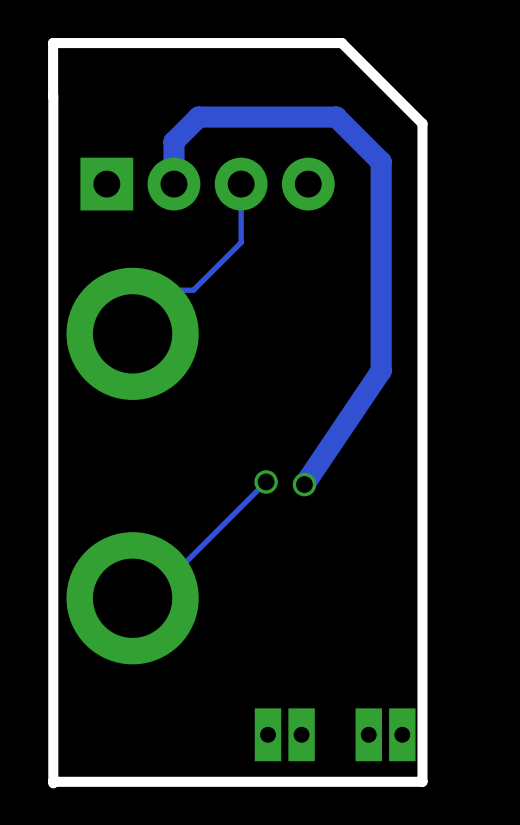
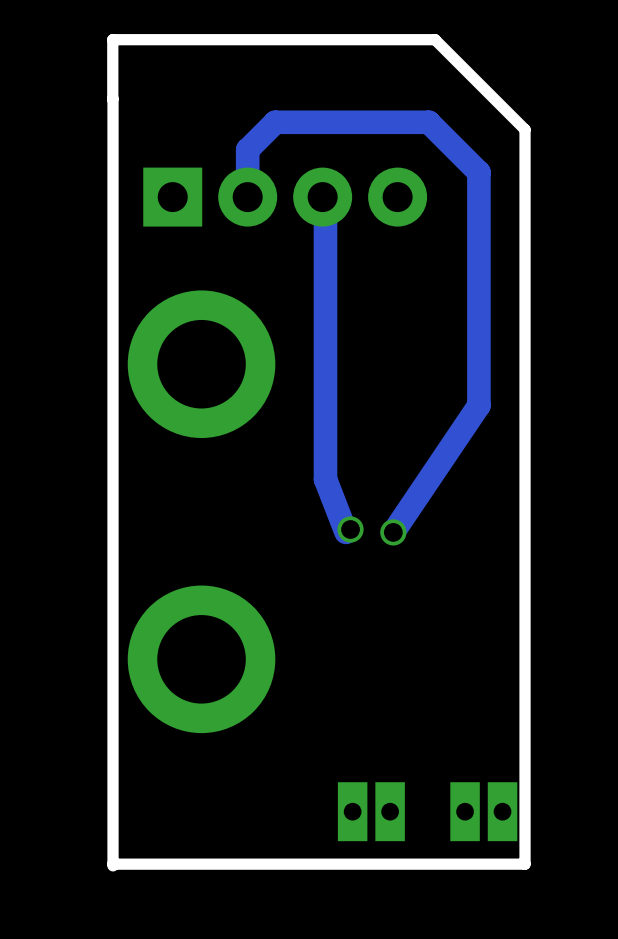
track: (241, 184) (241, 242) (193, 290) (176, 290) (132, 333) -> (322, 197) (325, 199) (325, 479) (346, 532)
track: (266, 481) (149, 598) (132, 598) -> none

